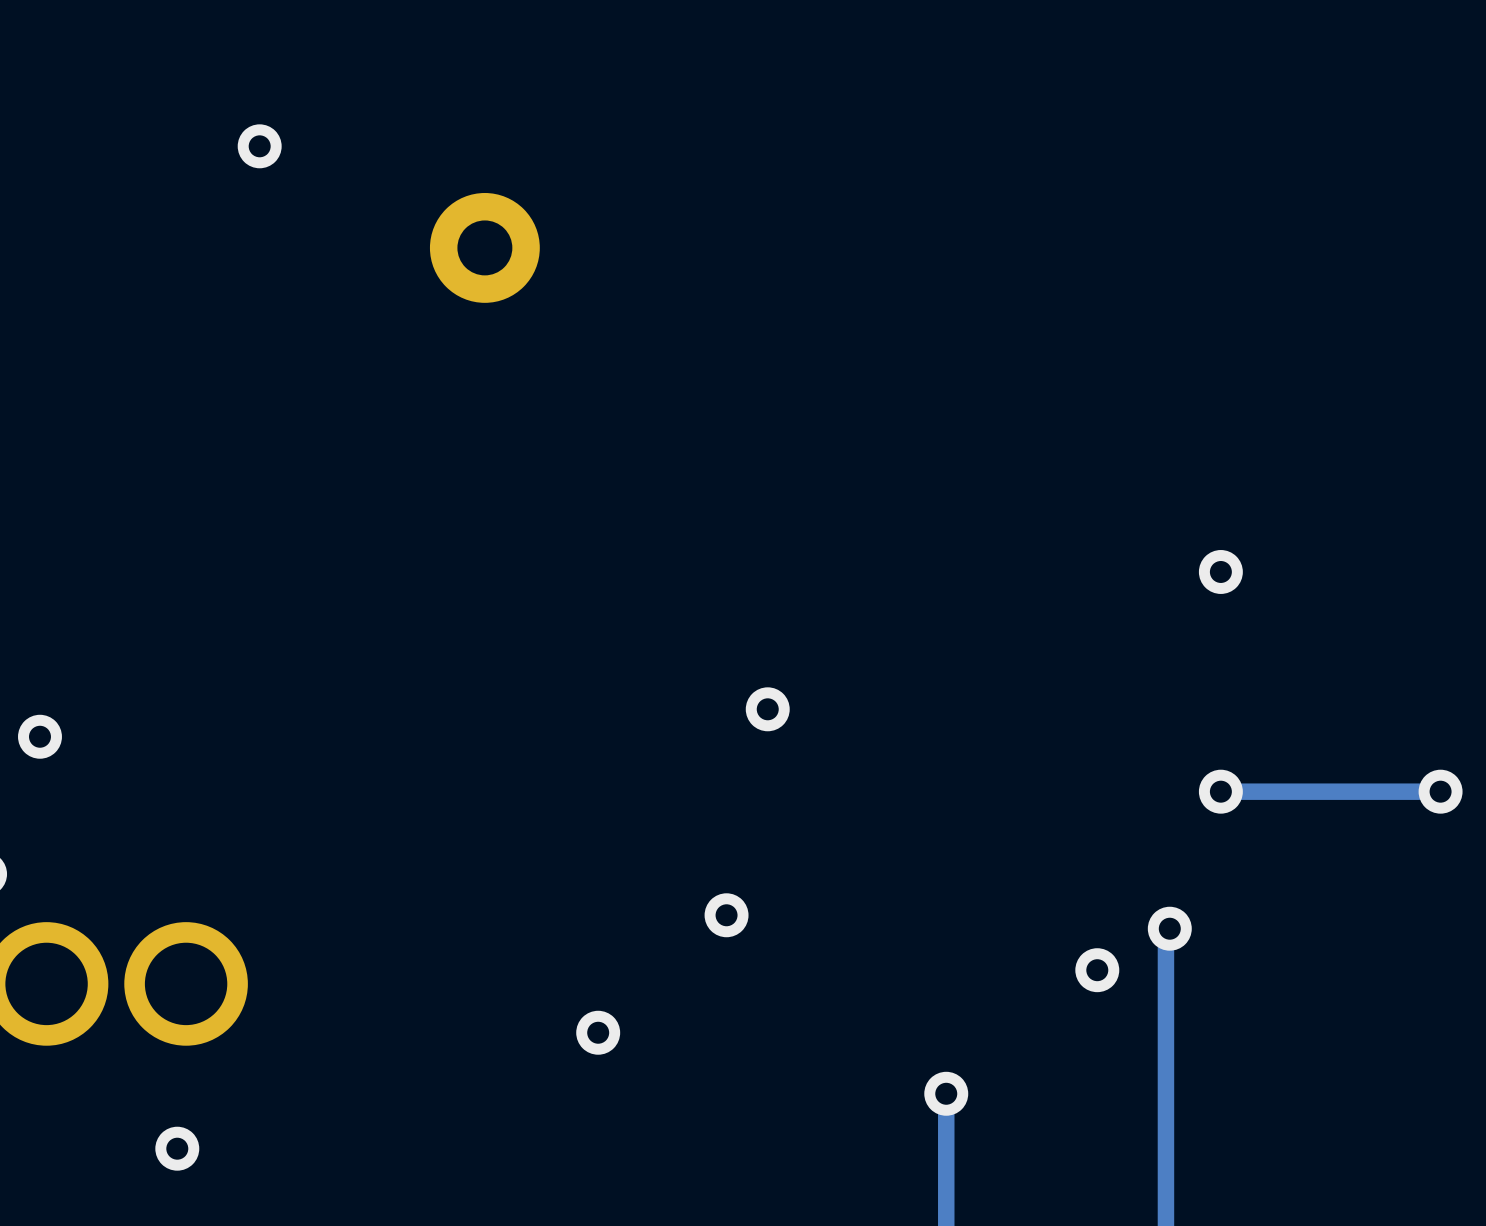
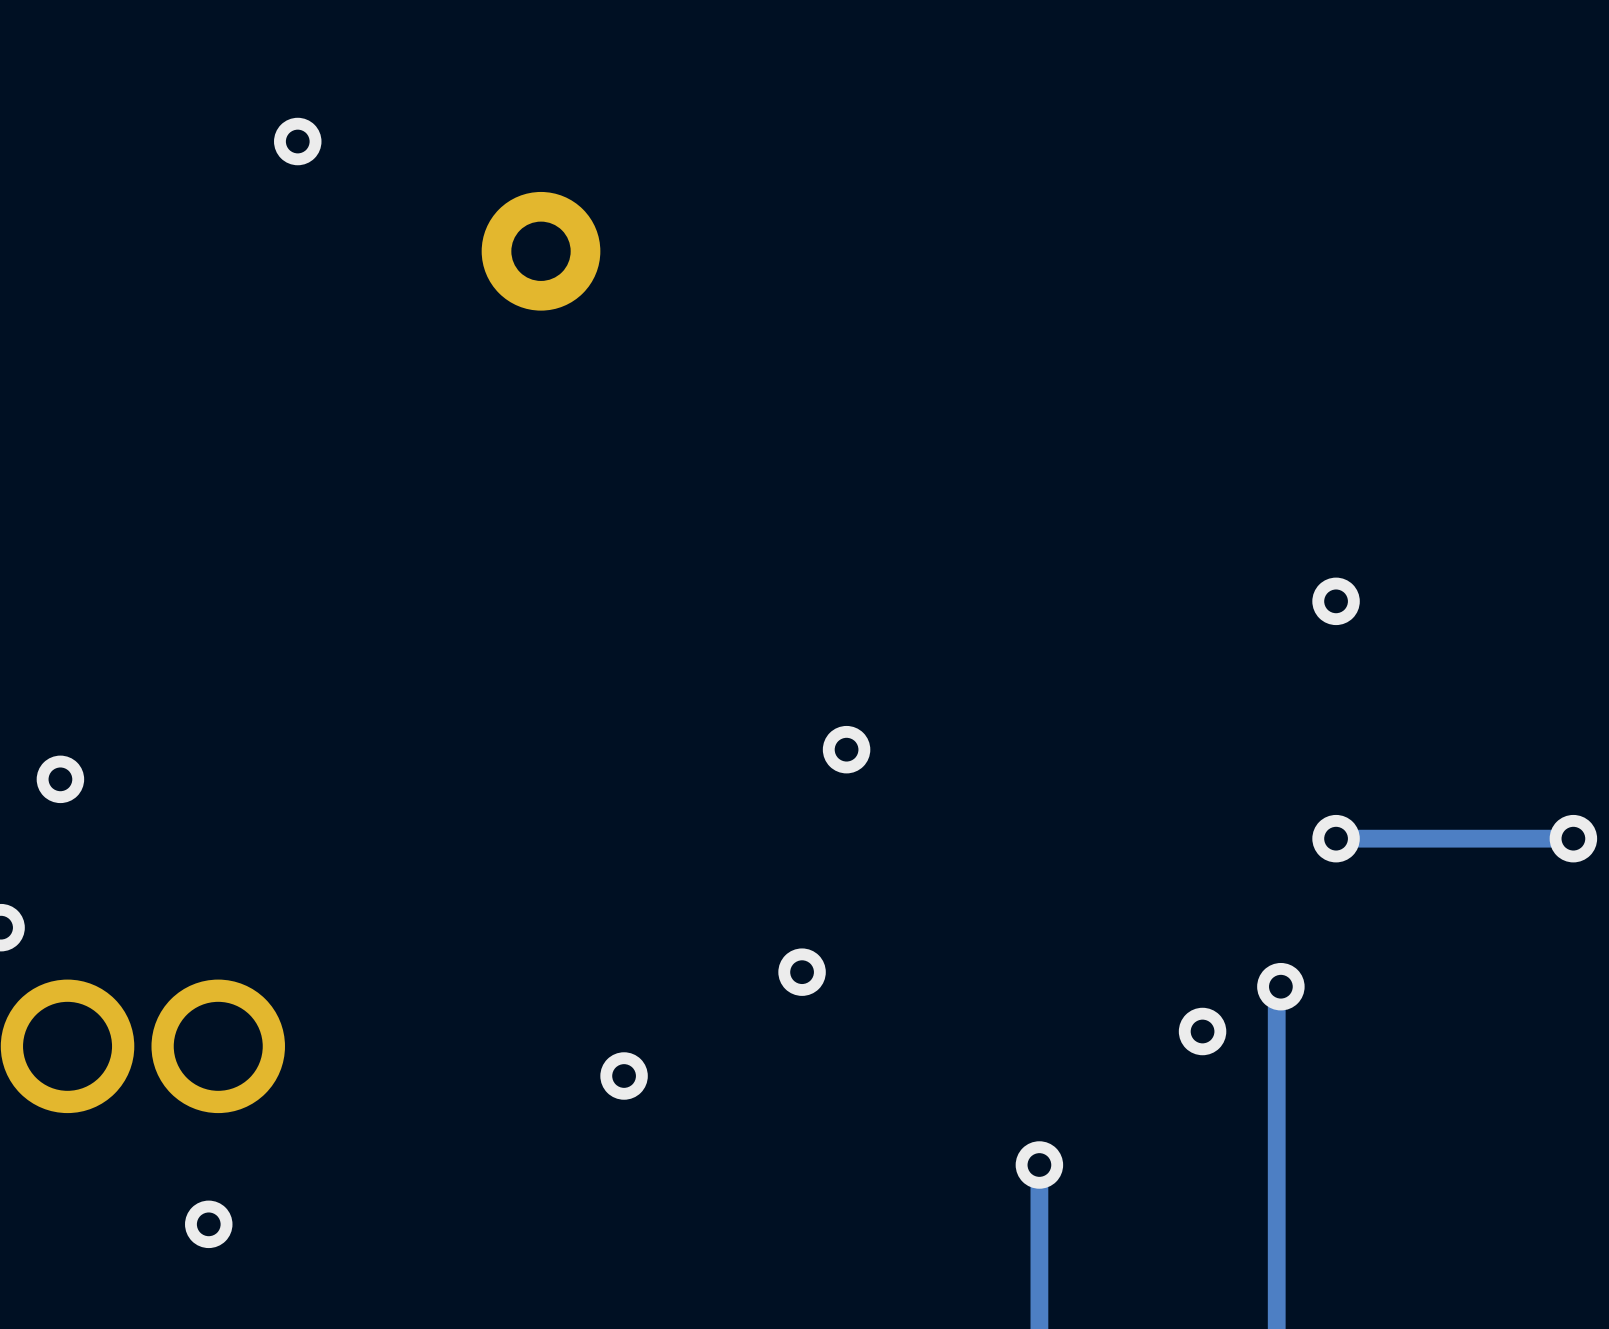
via position: (598, 1032) -> (624, 1076)

